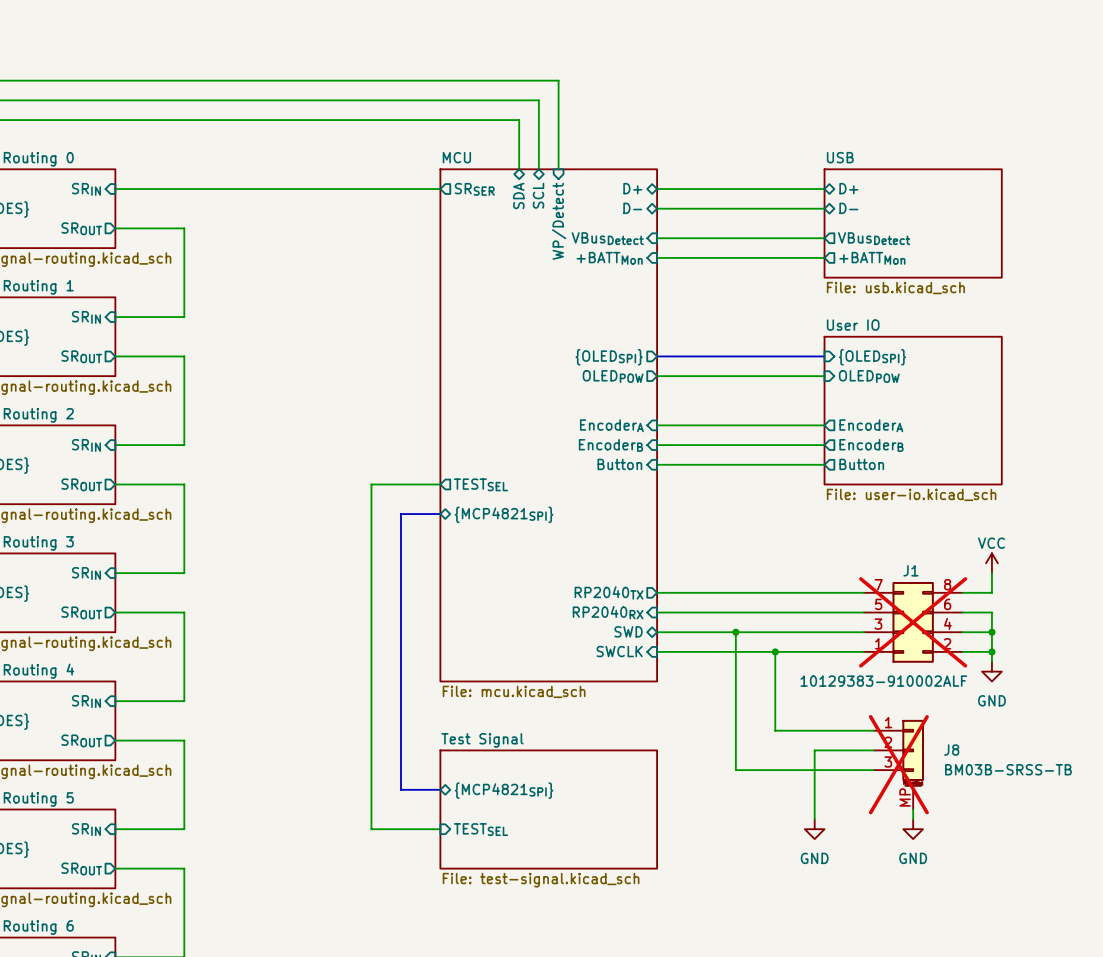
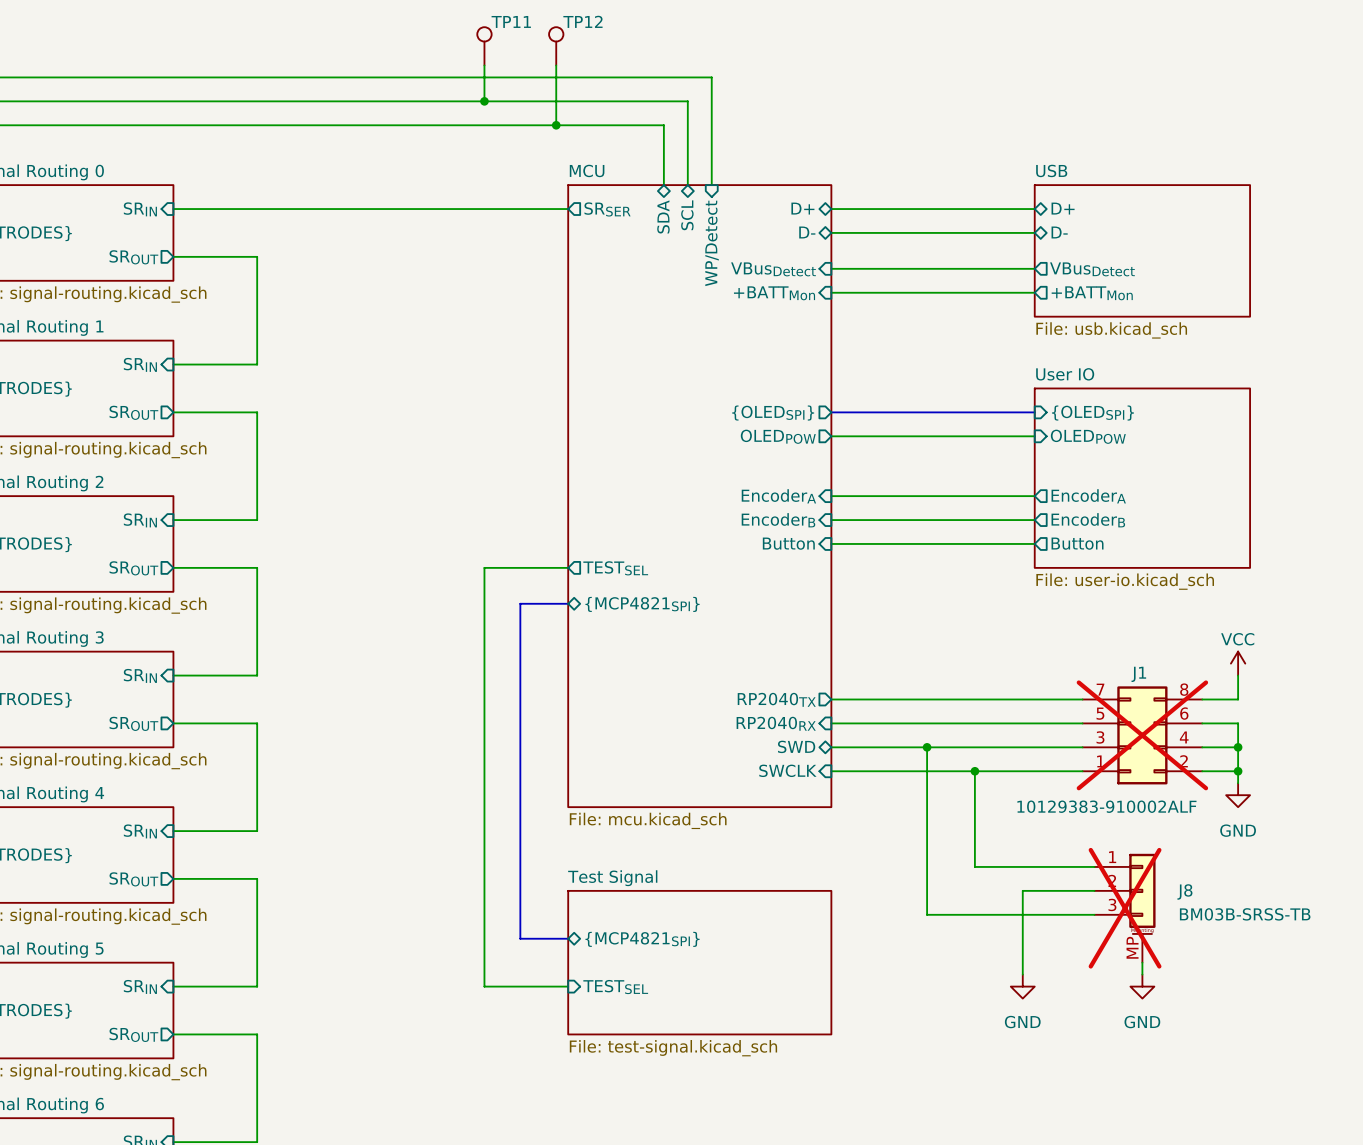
TP11: none -> (484, 46)
TP12: none -> (556, 46)
wire: none -> (484, 65) (484, 101)
wire: none -> (556, 65) (556, 125)
junction: none -> (484, 101)
junction: none -> (556, 125)

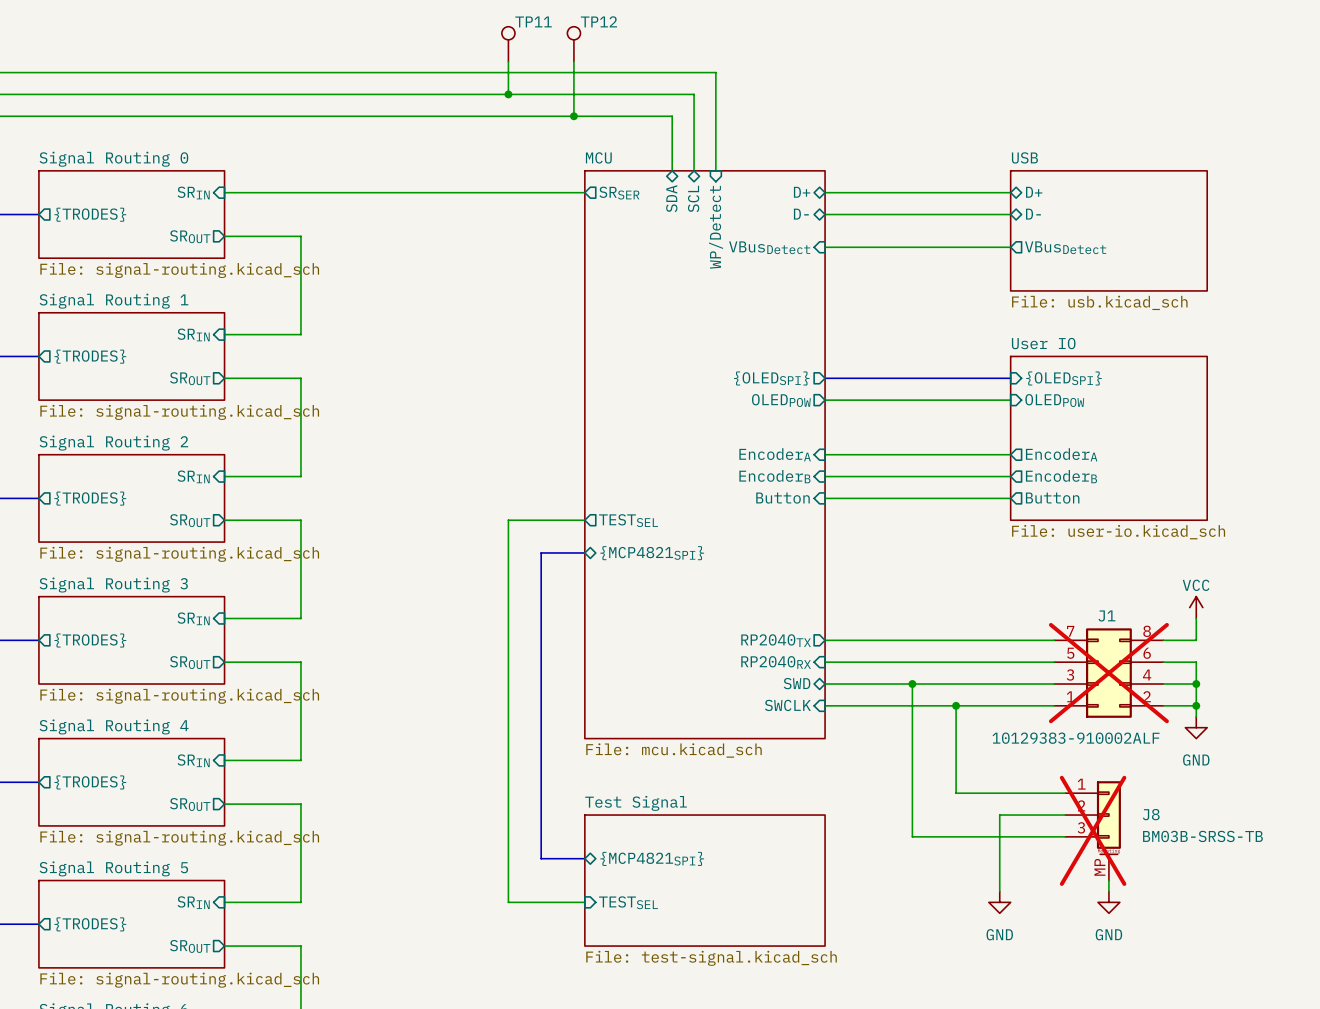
wire: (831, 292) (1034, 292) -> none
sheet pin: +BATTMon (774, 293) -> none
sheet pin: +BATTMon (1092, 293) -> none

